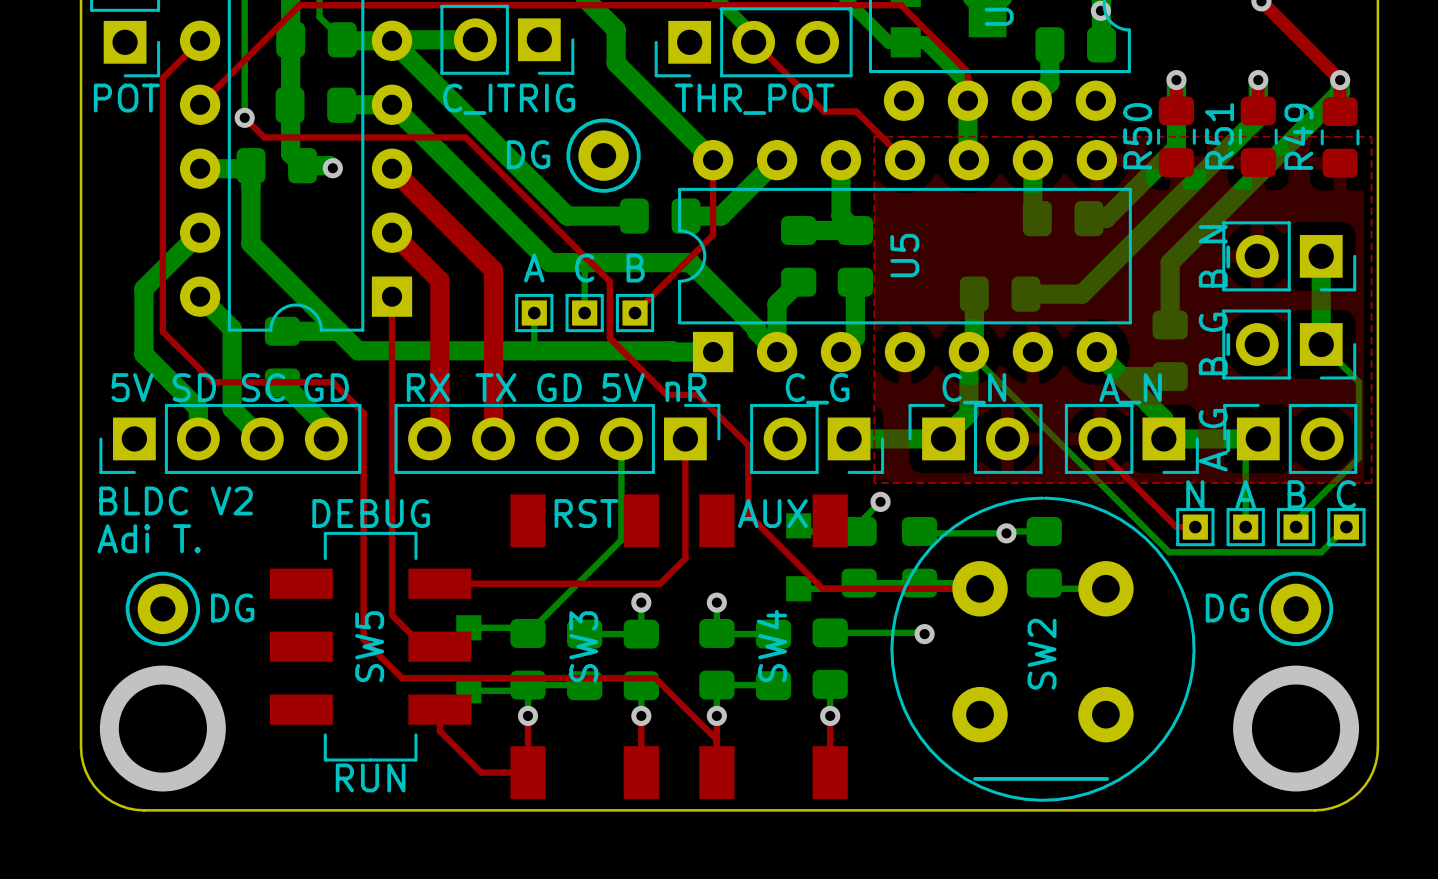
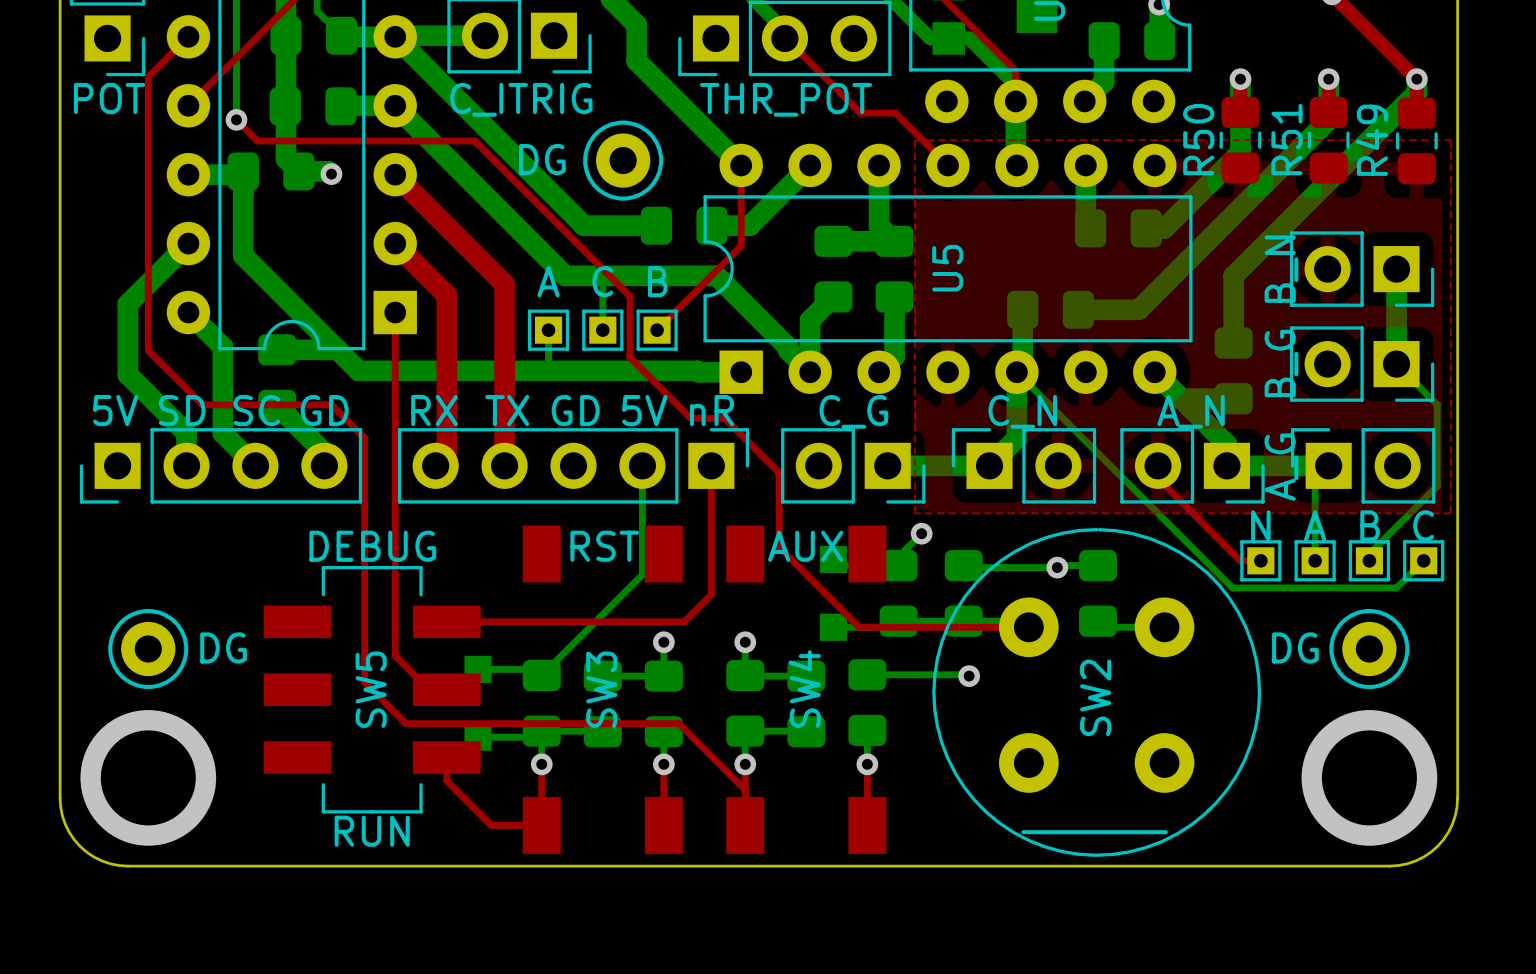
text: BLDC V2 (176, 500) -> none
text: Adi T. (149, 538) -> none

